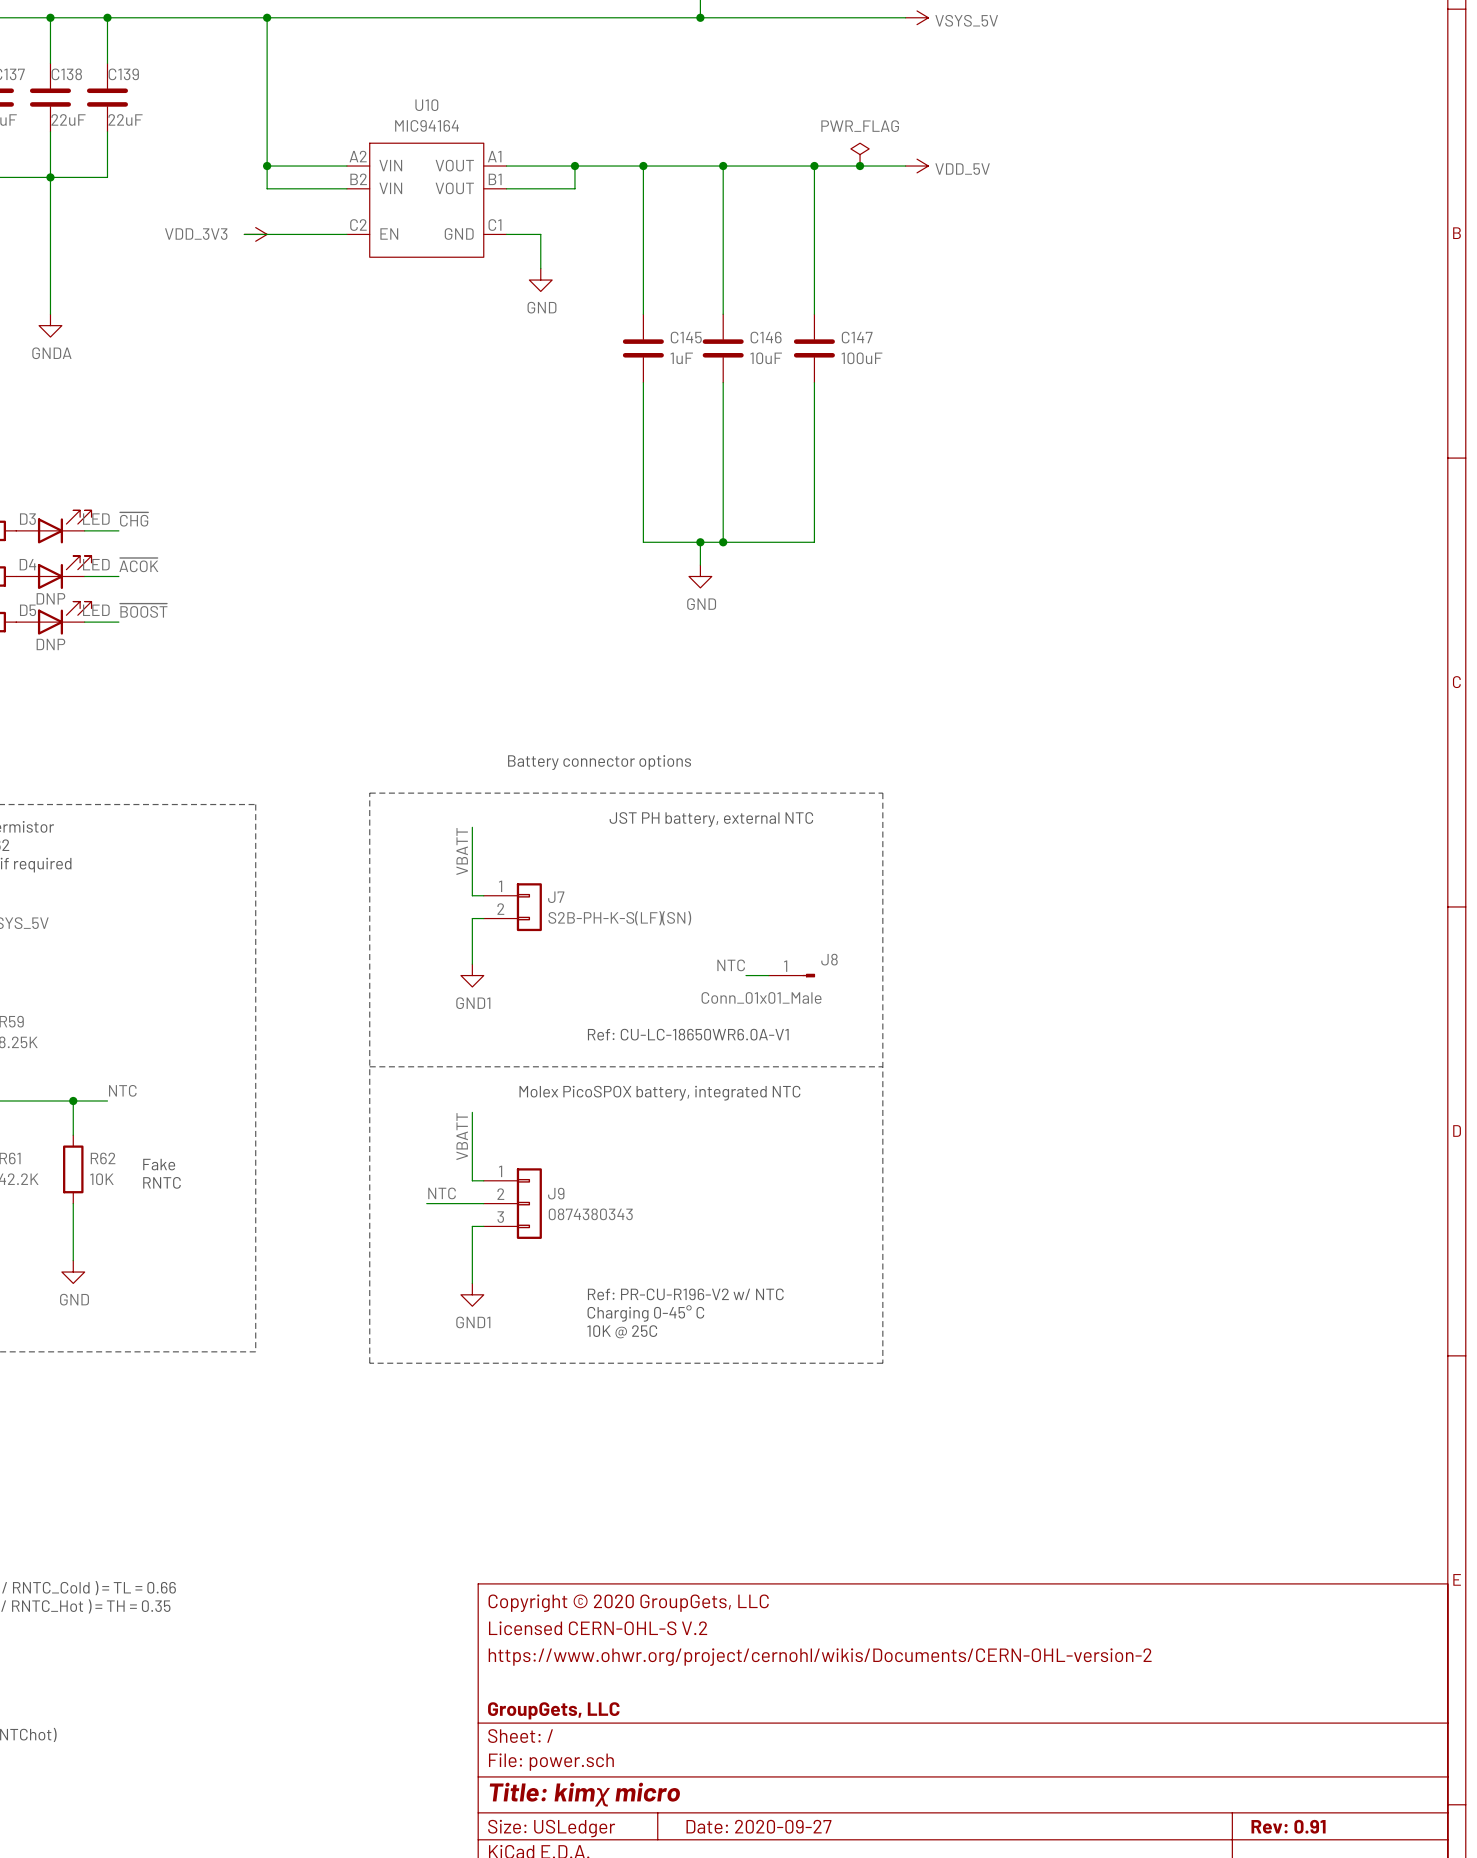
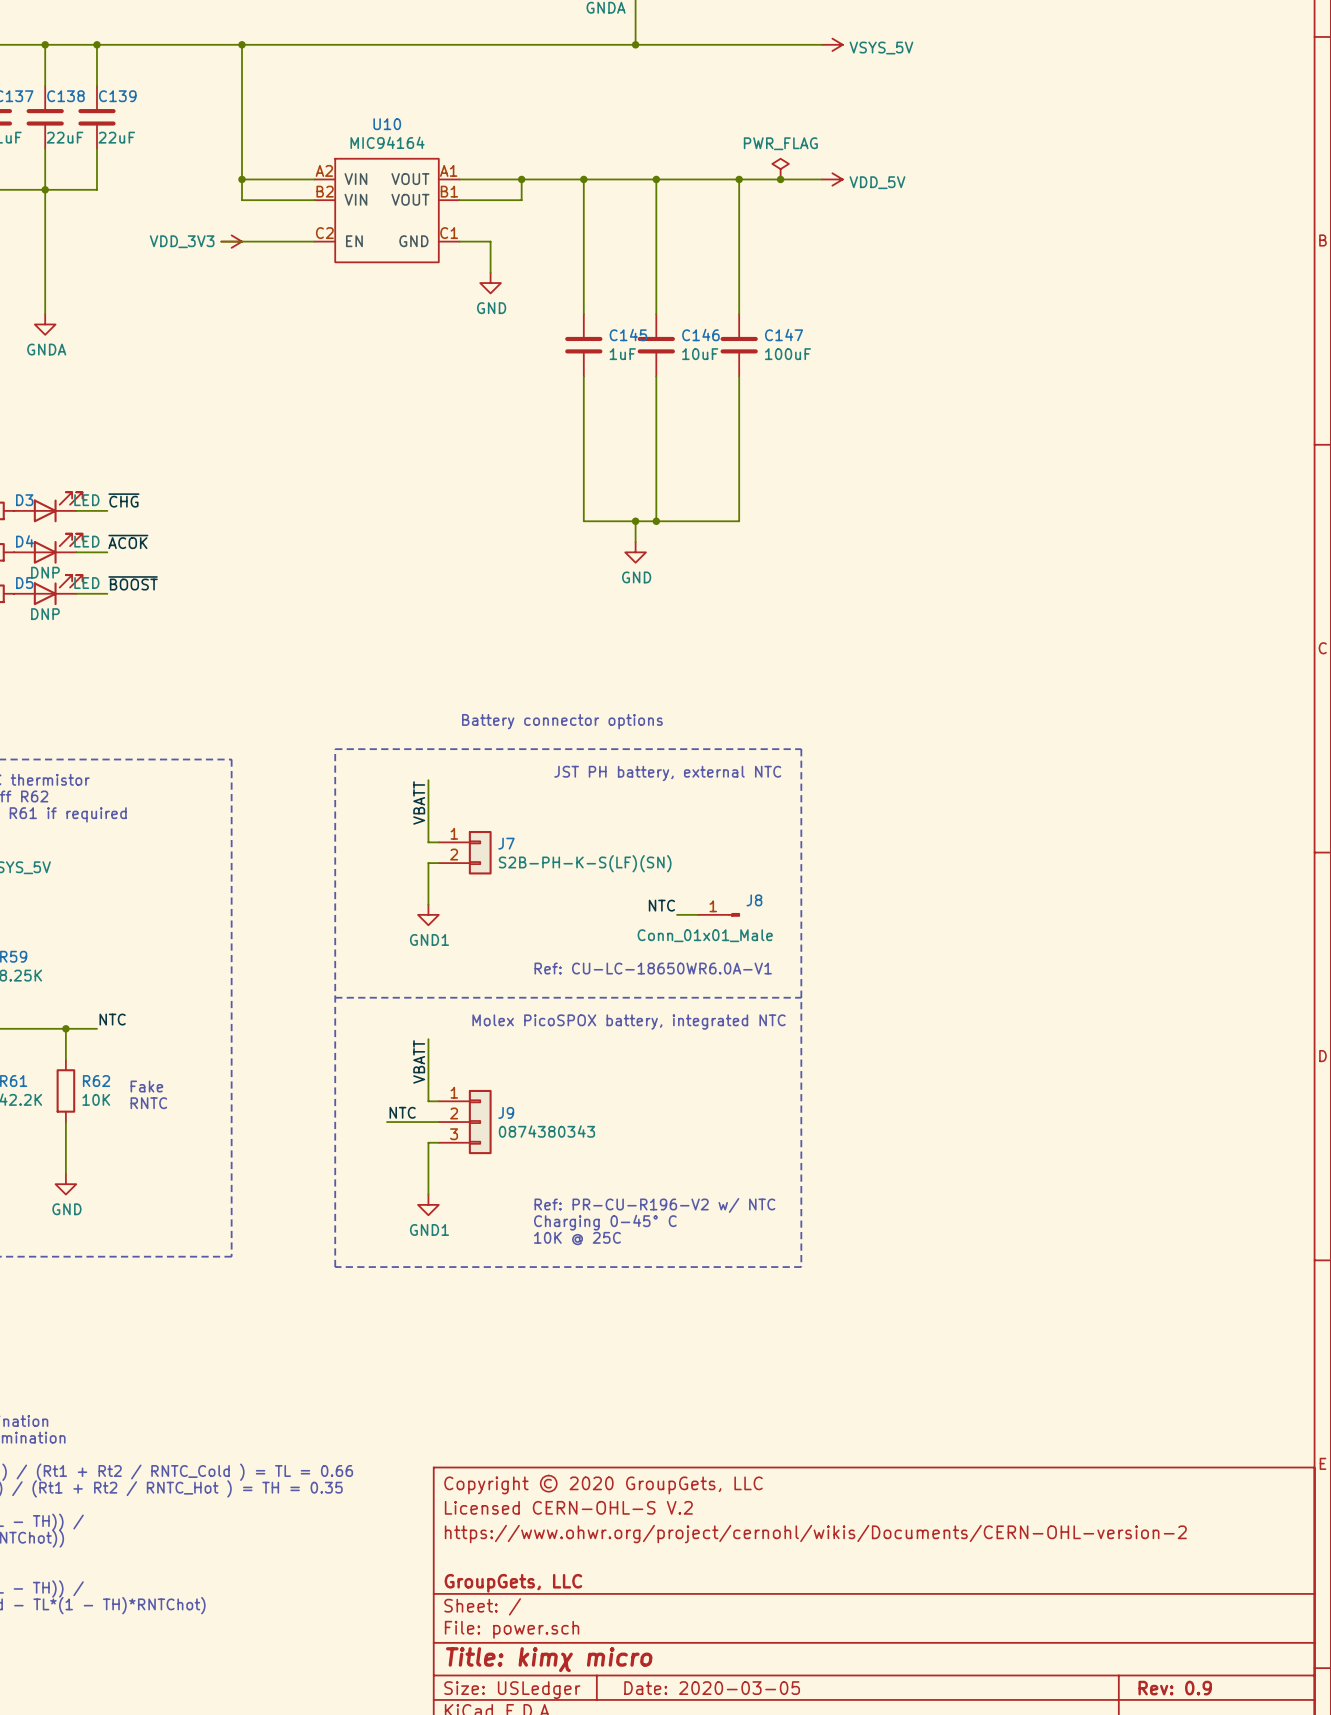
title block: Date: 2020-09-27 (758, 1826) -> Date: 2020-03-05 (712, 1688)
title block: Rev: 0.91 (1288, 1826) -> Rev: 0.9 (1175, 1688)

